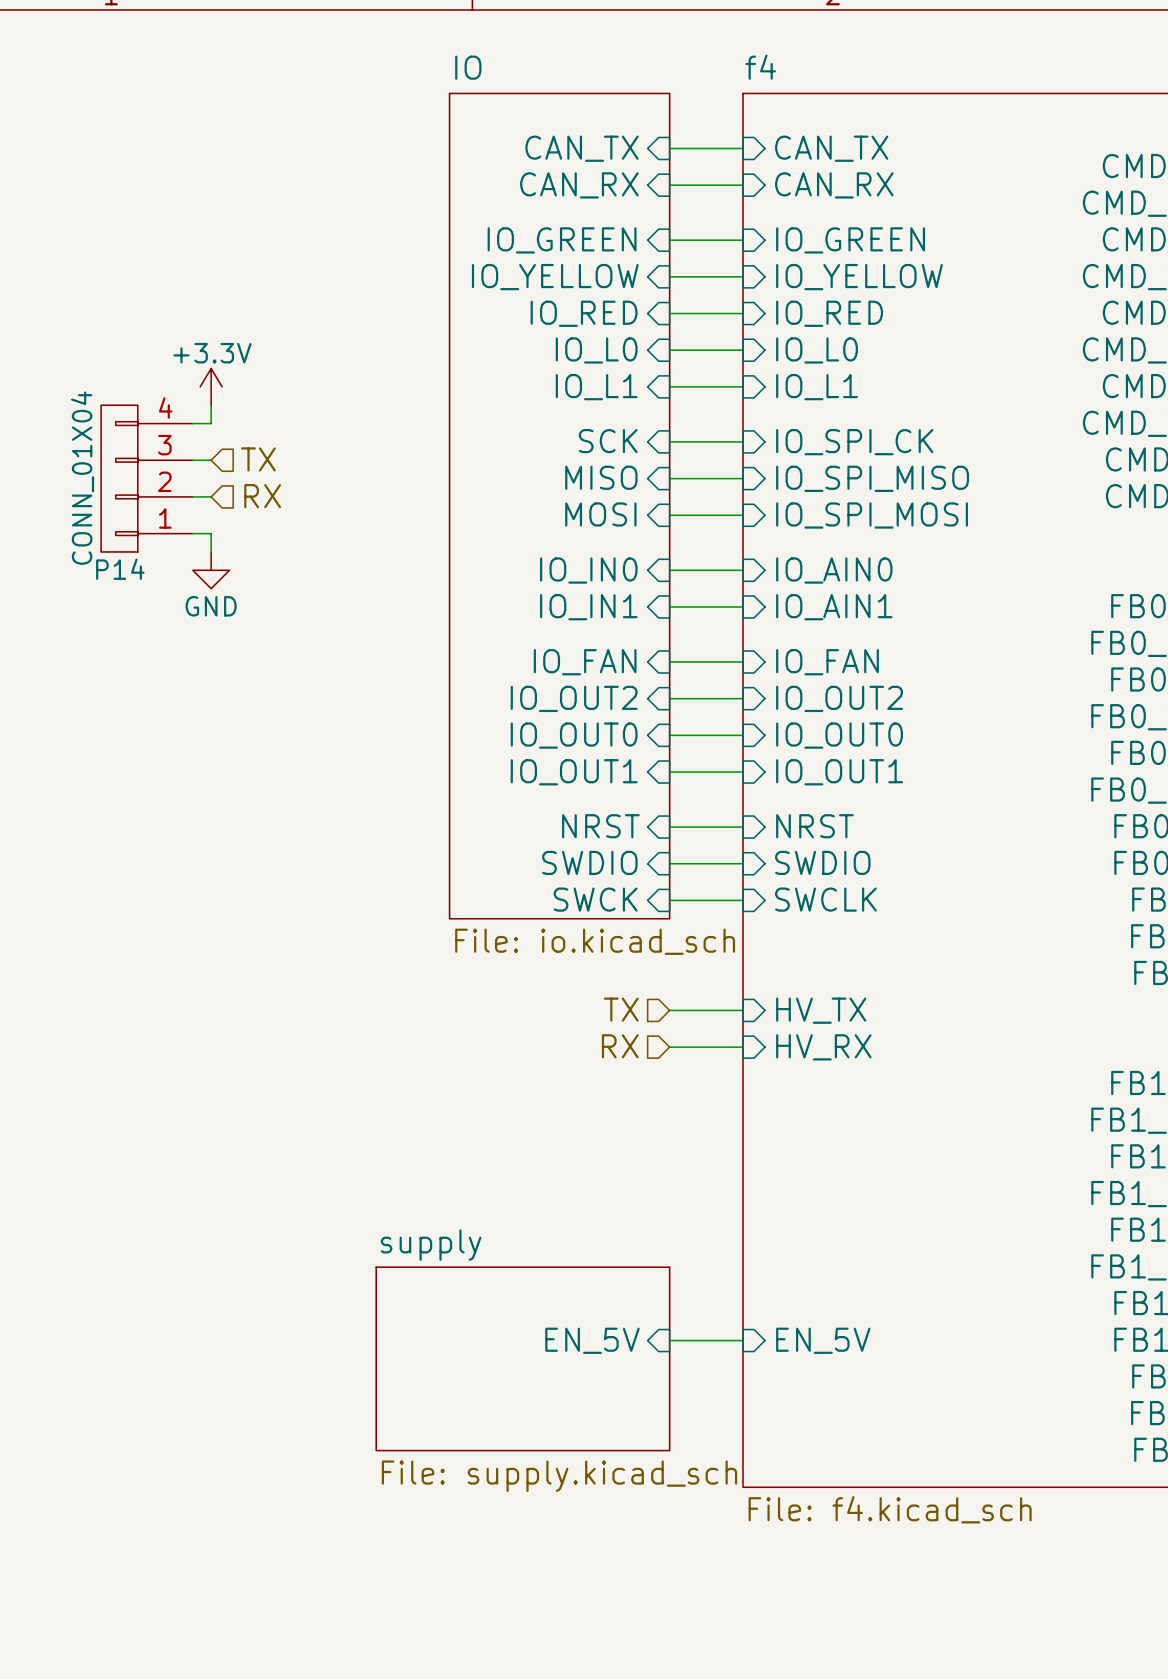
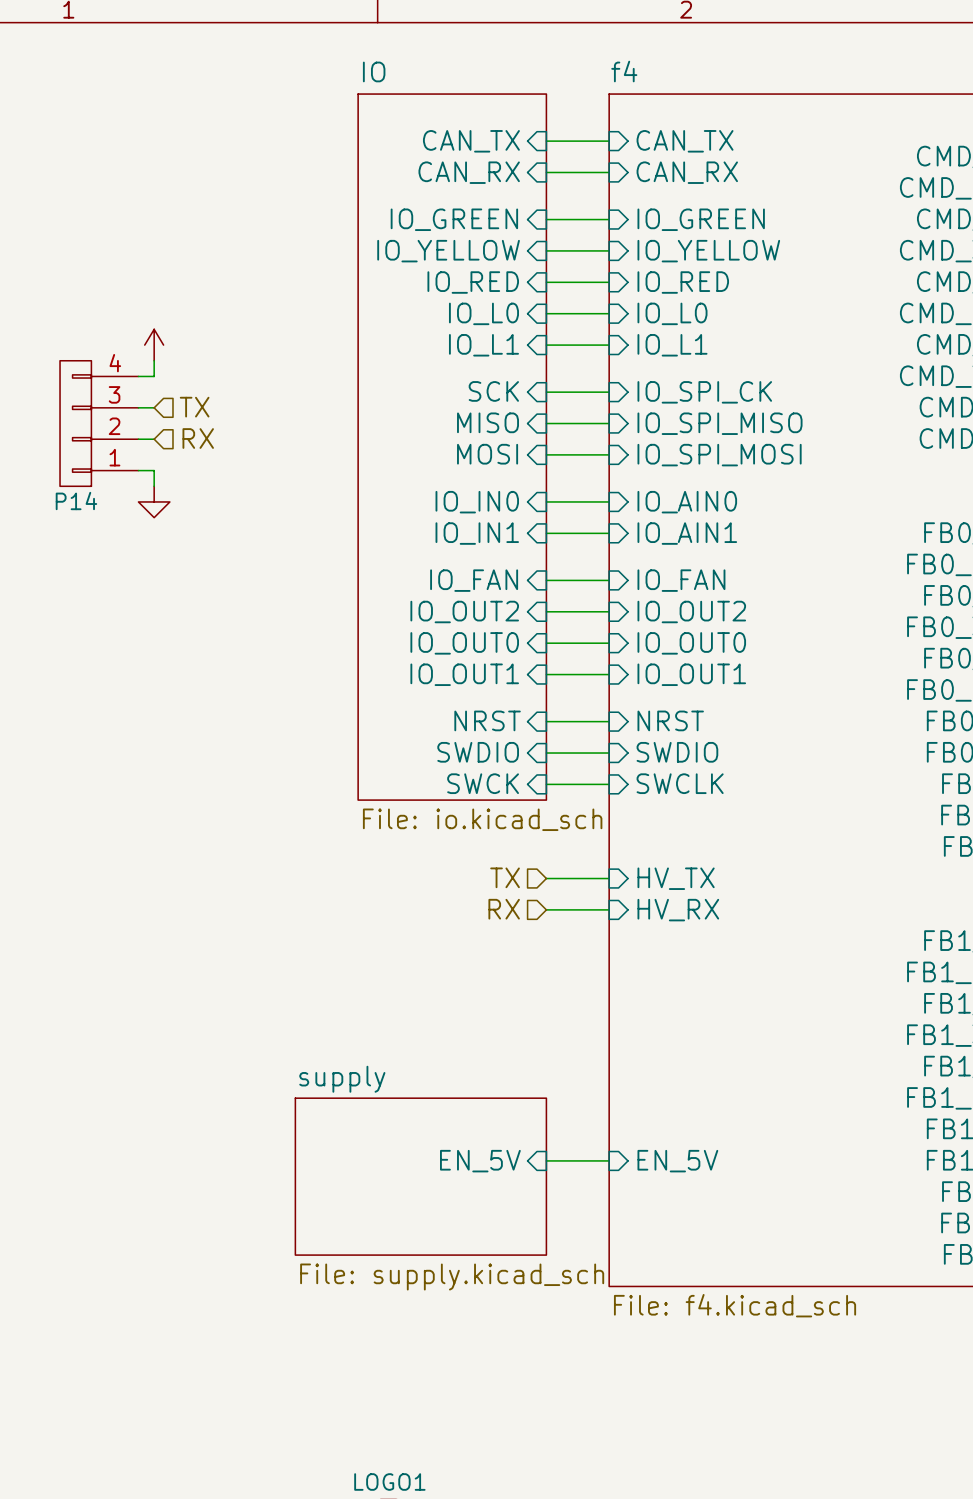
power symbol text: +3.3V (212, 353) -> none
P14 value: CONN_01X04 (82, 478) -> none
power symbol text: GND (211, 606) -> none

